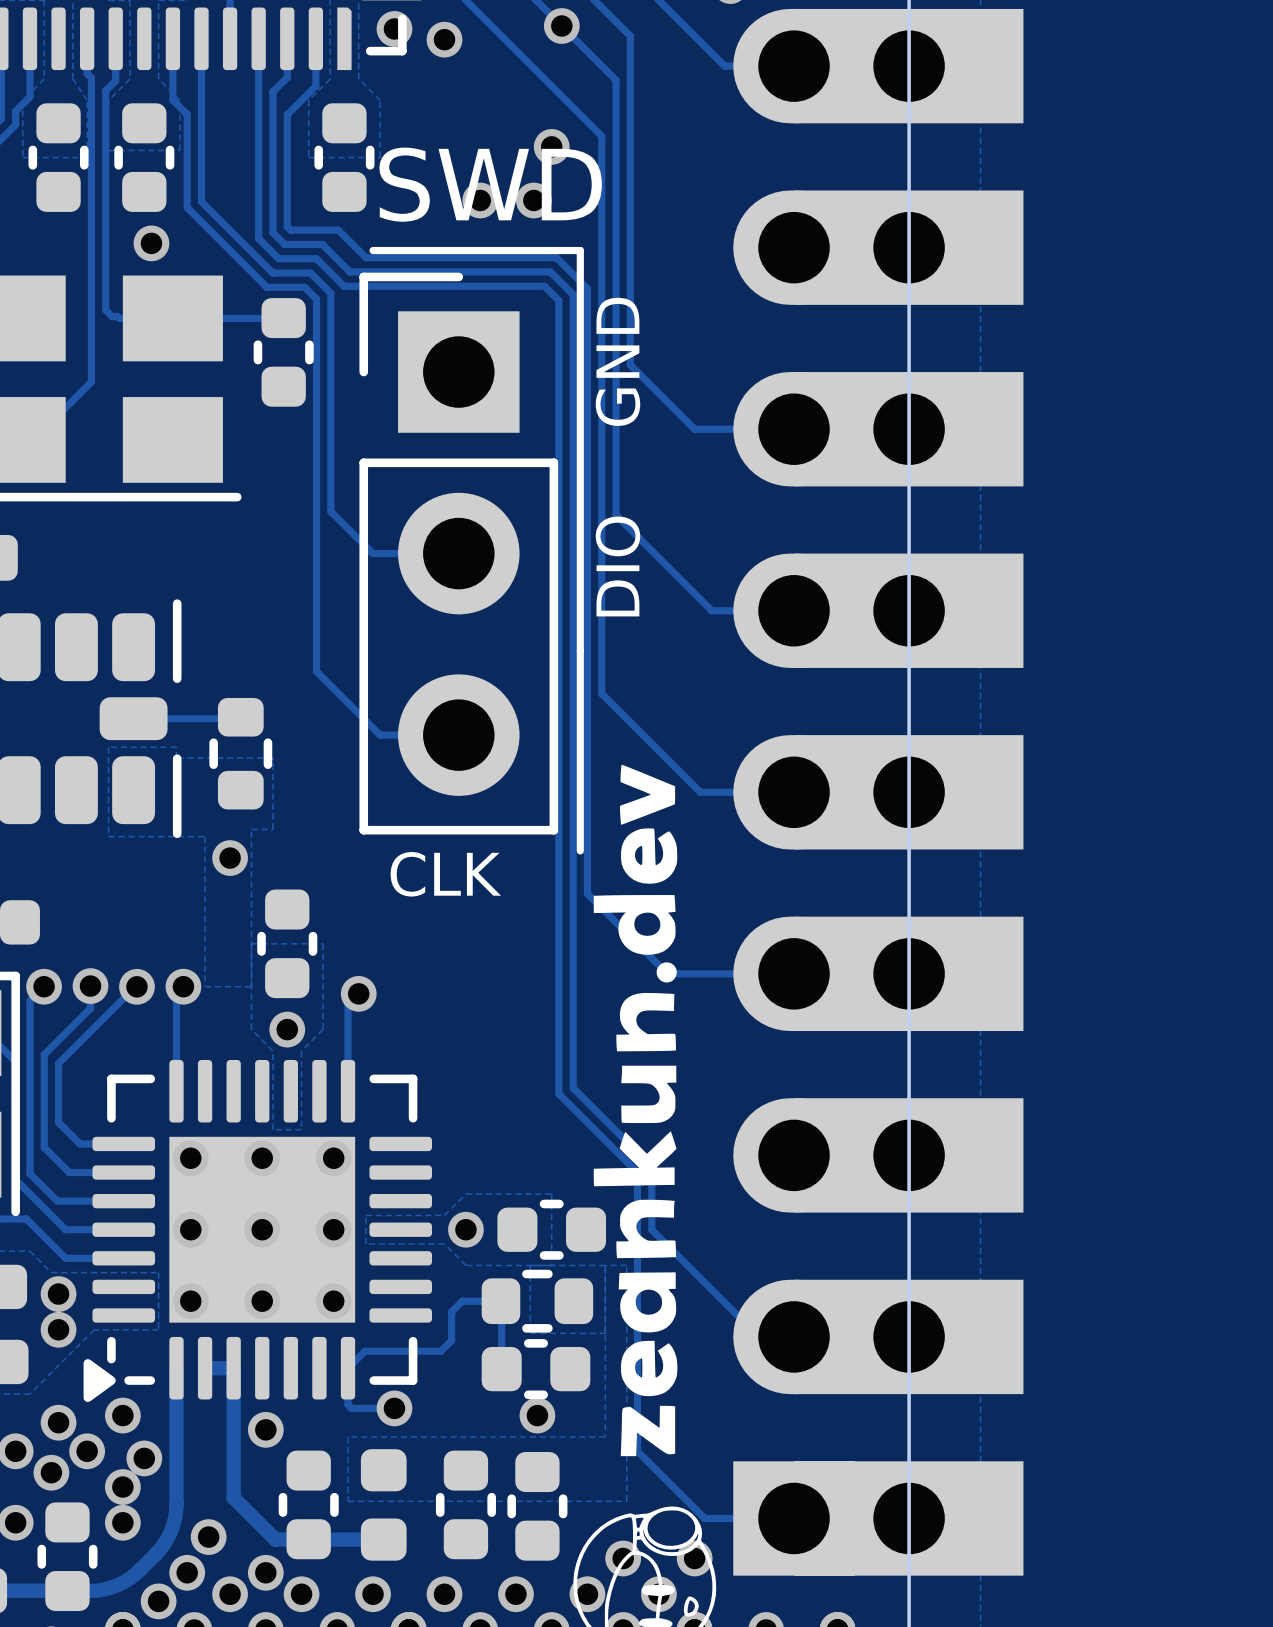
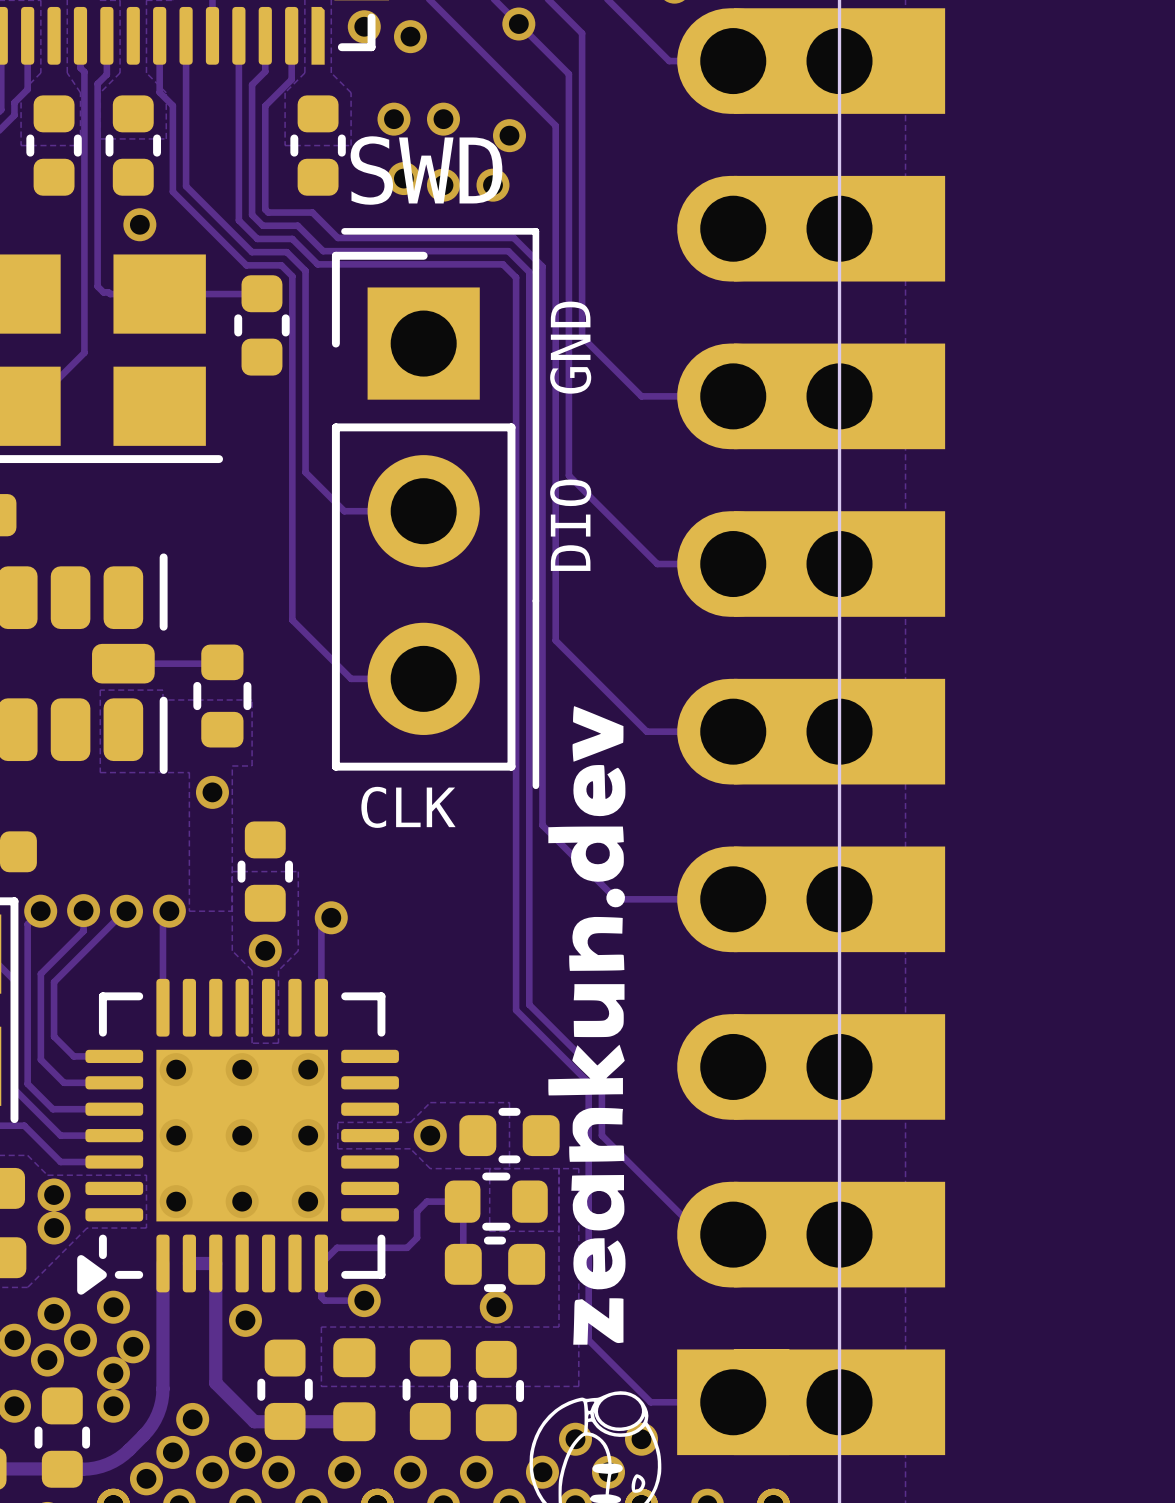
via: none -> (393, 119)
via: none -> (443, 119)
via: none -> (403, 178)

